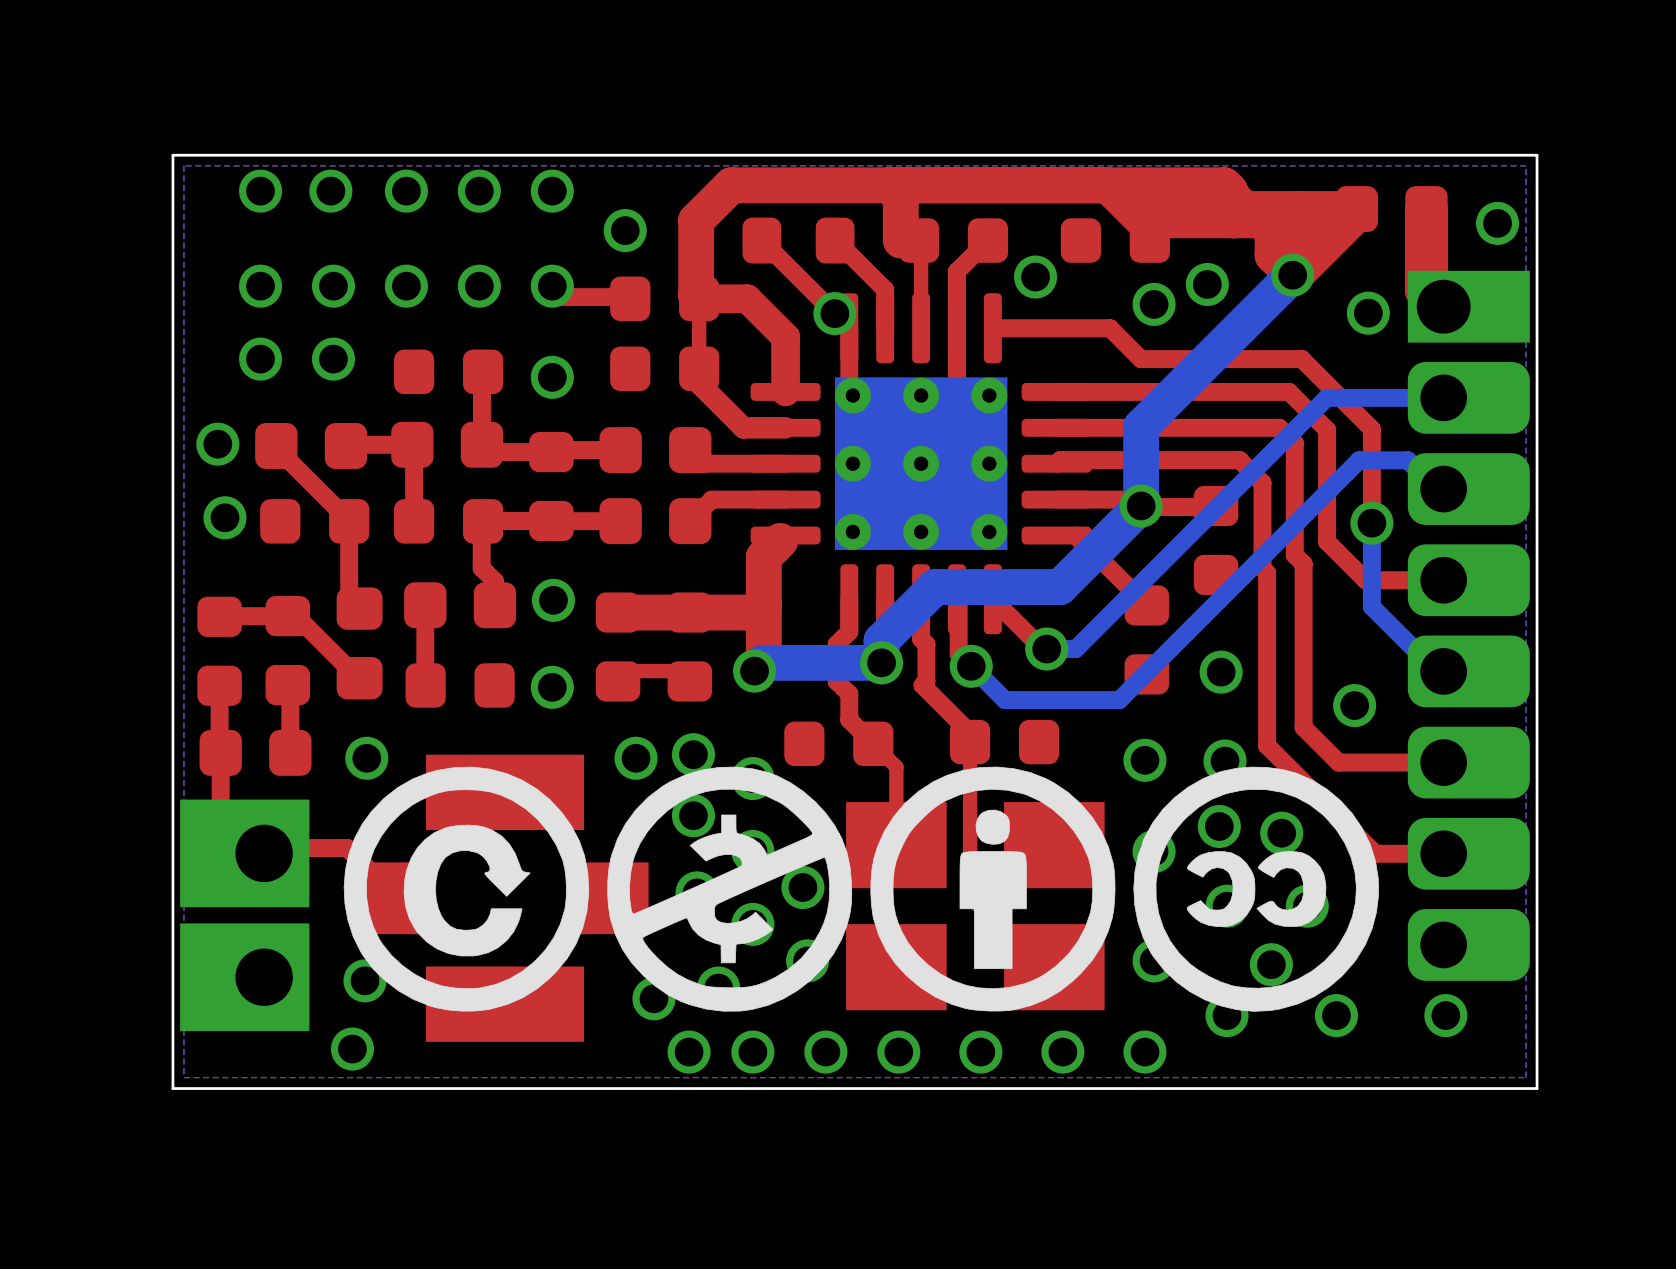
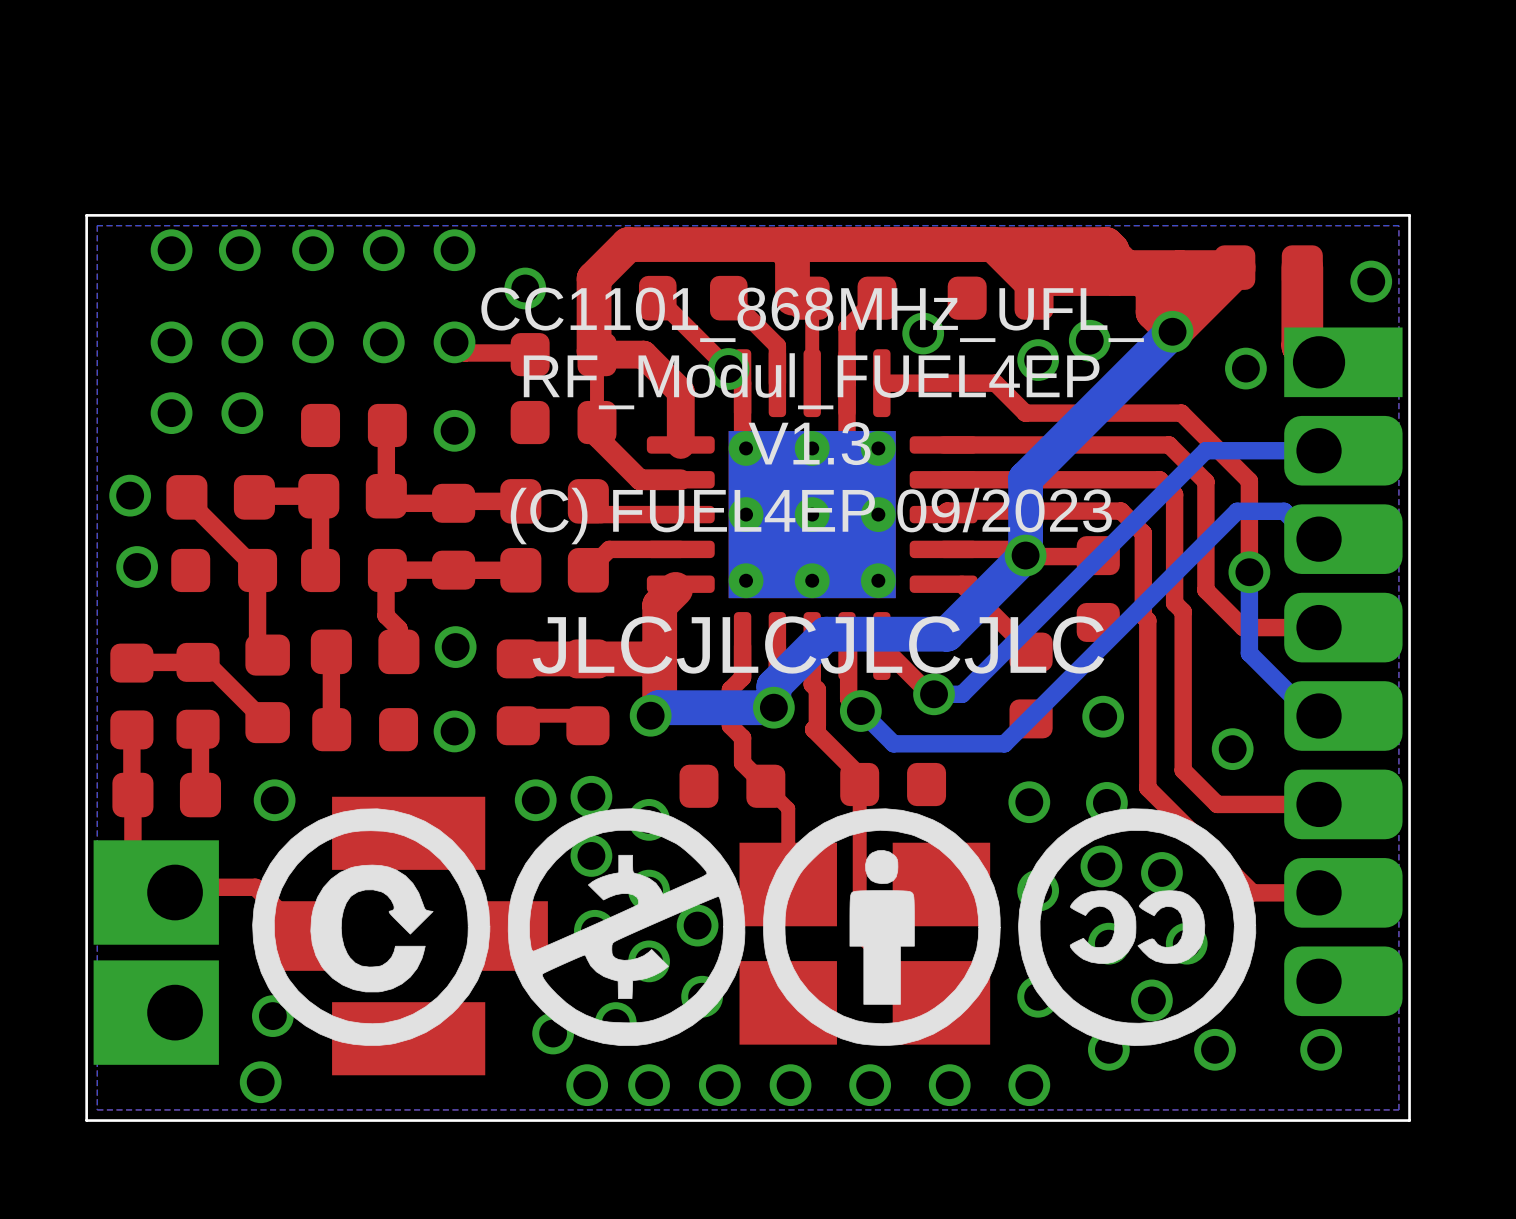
text: none -> CC1101_868MHz_UFL_ (812, 314)
text: none -> RF_Modul_FUEL4EP (811, 381)
text: none -> V1.3 (809, 443)
text: none -> (C) FUEL4EP 09/2023 (811, 516)
text: none -> JLCJLCJLCJLC (818, 644)

